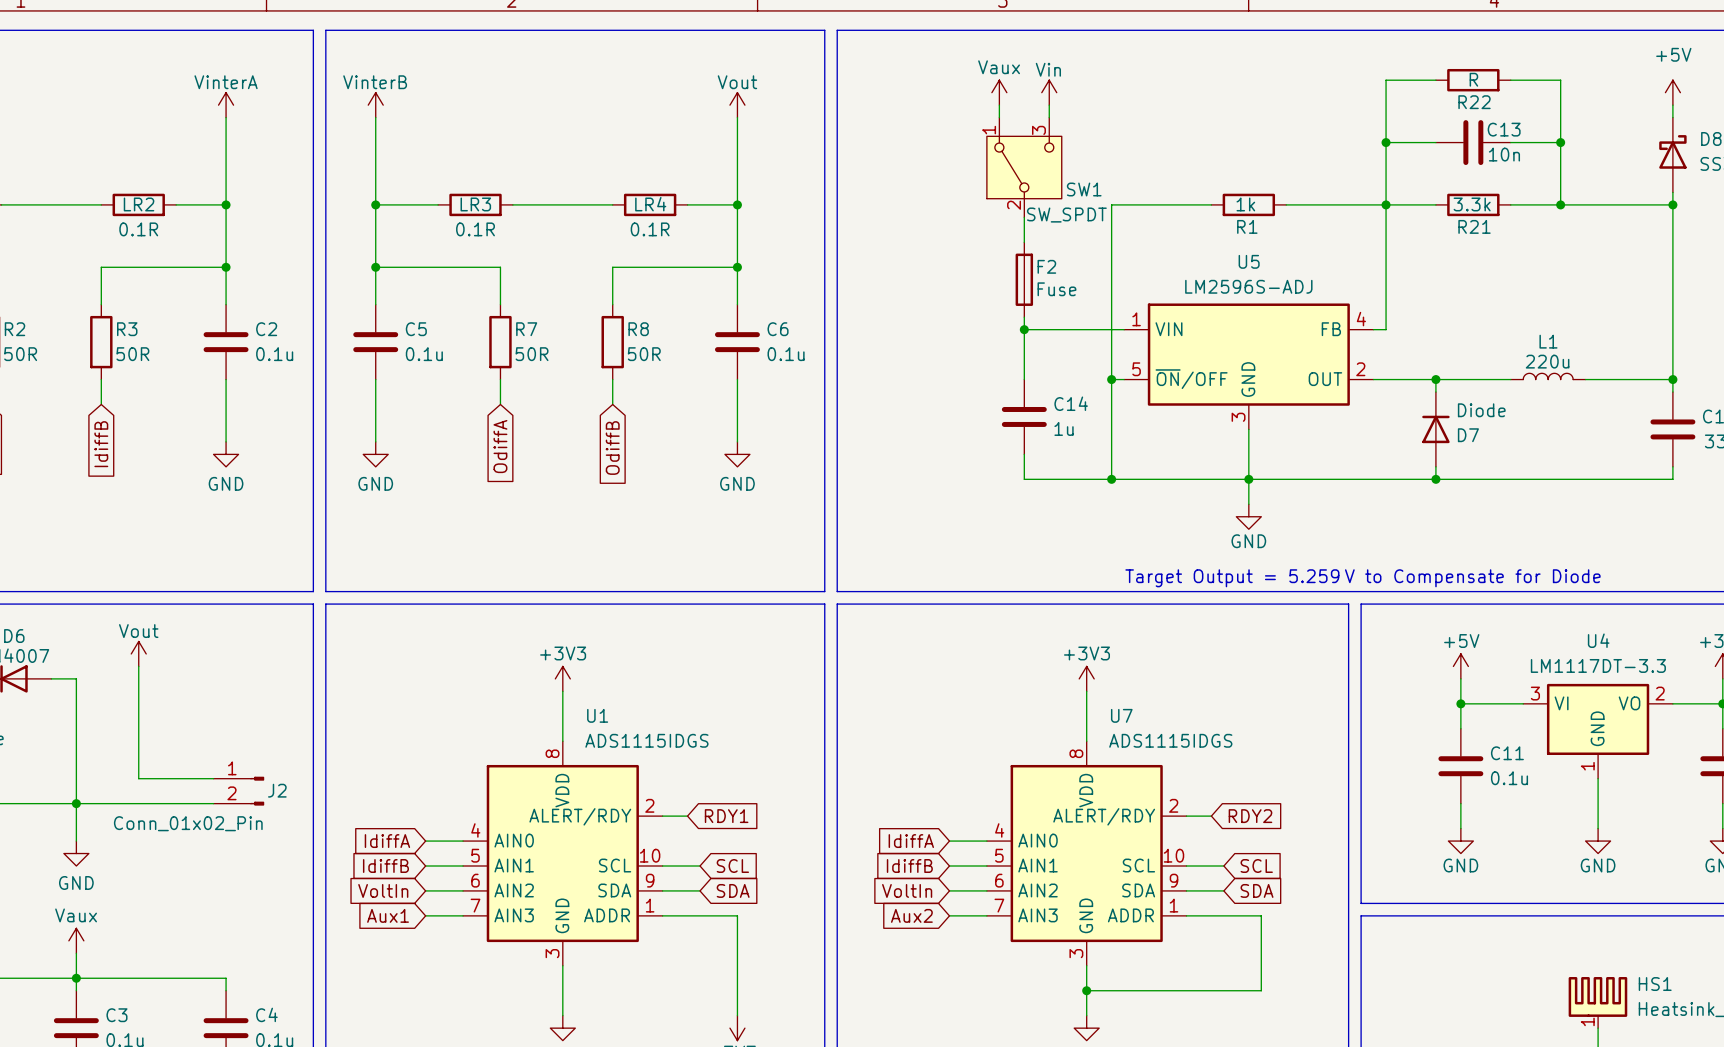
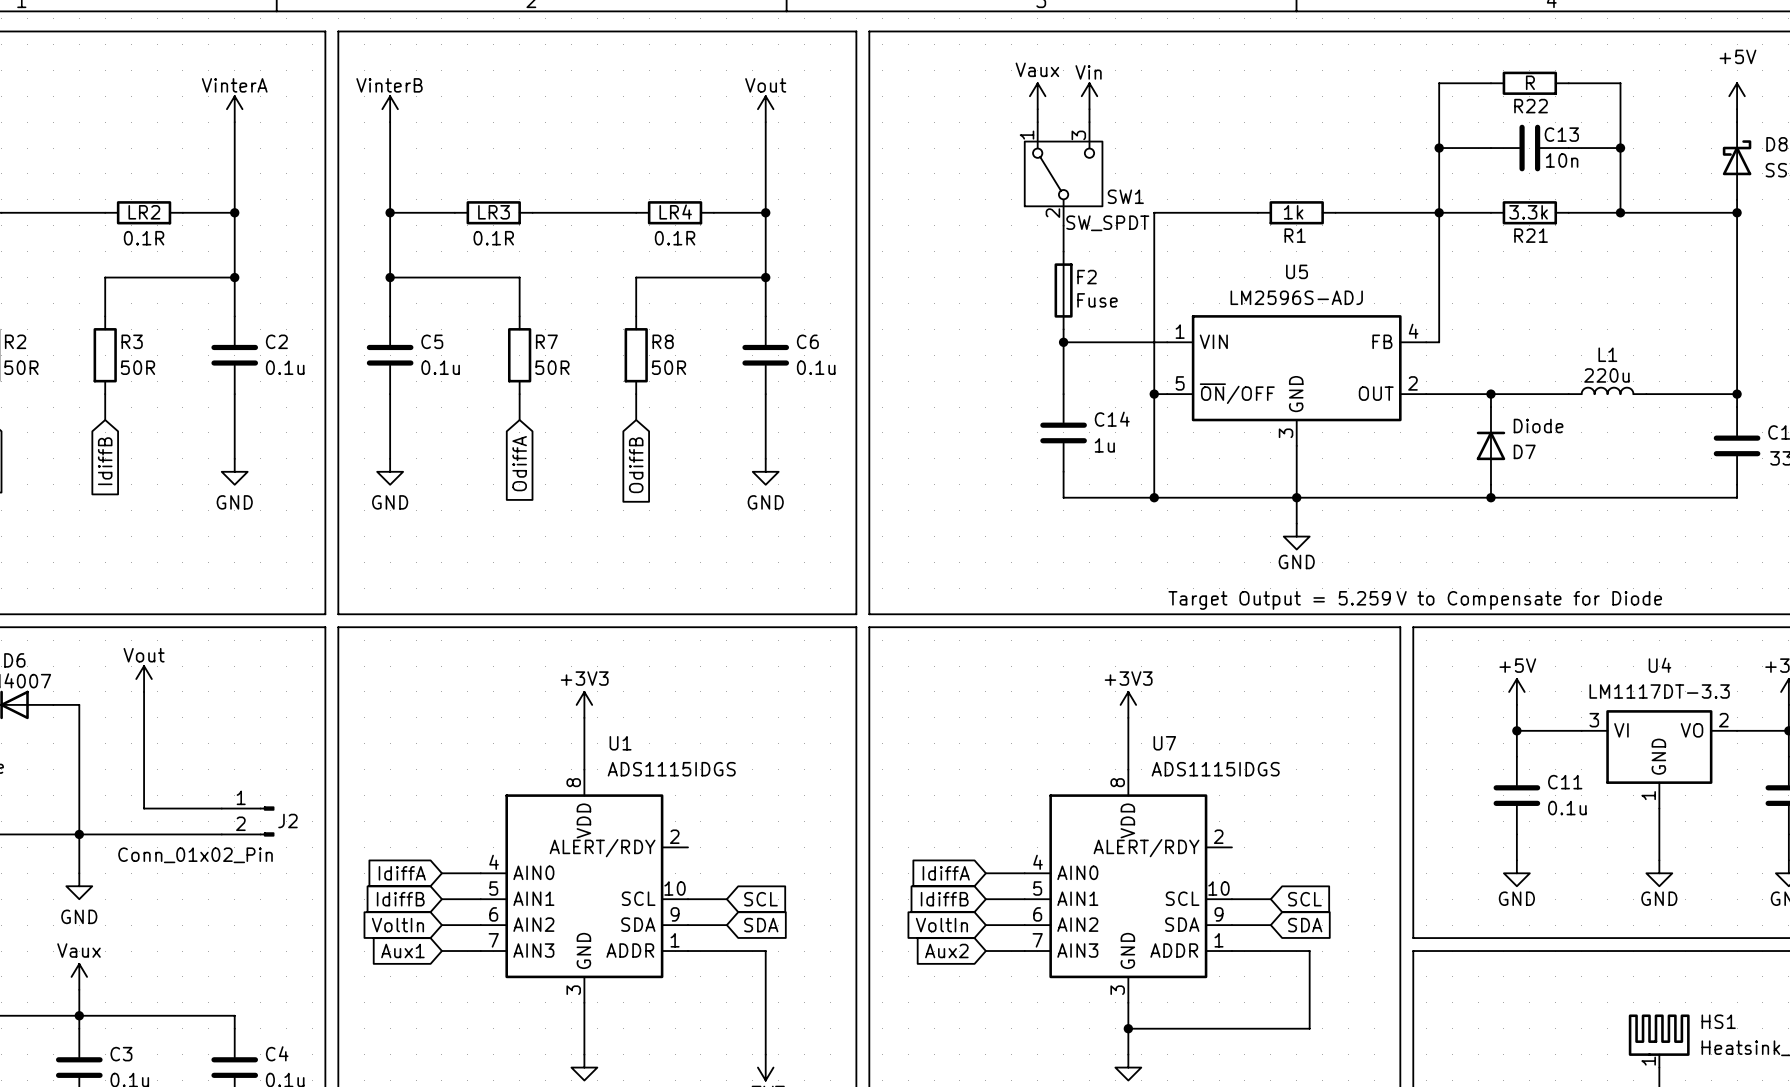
wire: (662, 816) (687, 816) -> none
global label: RDY1 (726, 816) -> none
wire: (1186, 816) (1211, 816) -> none
global label: RDY2 (1250, 816) -> none

